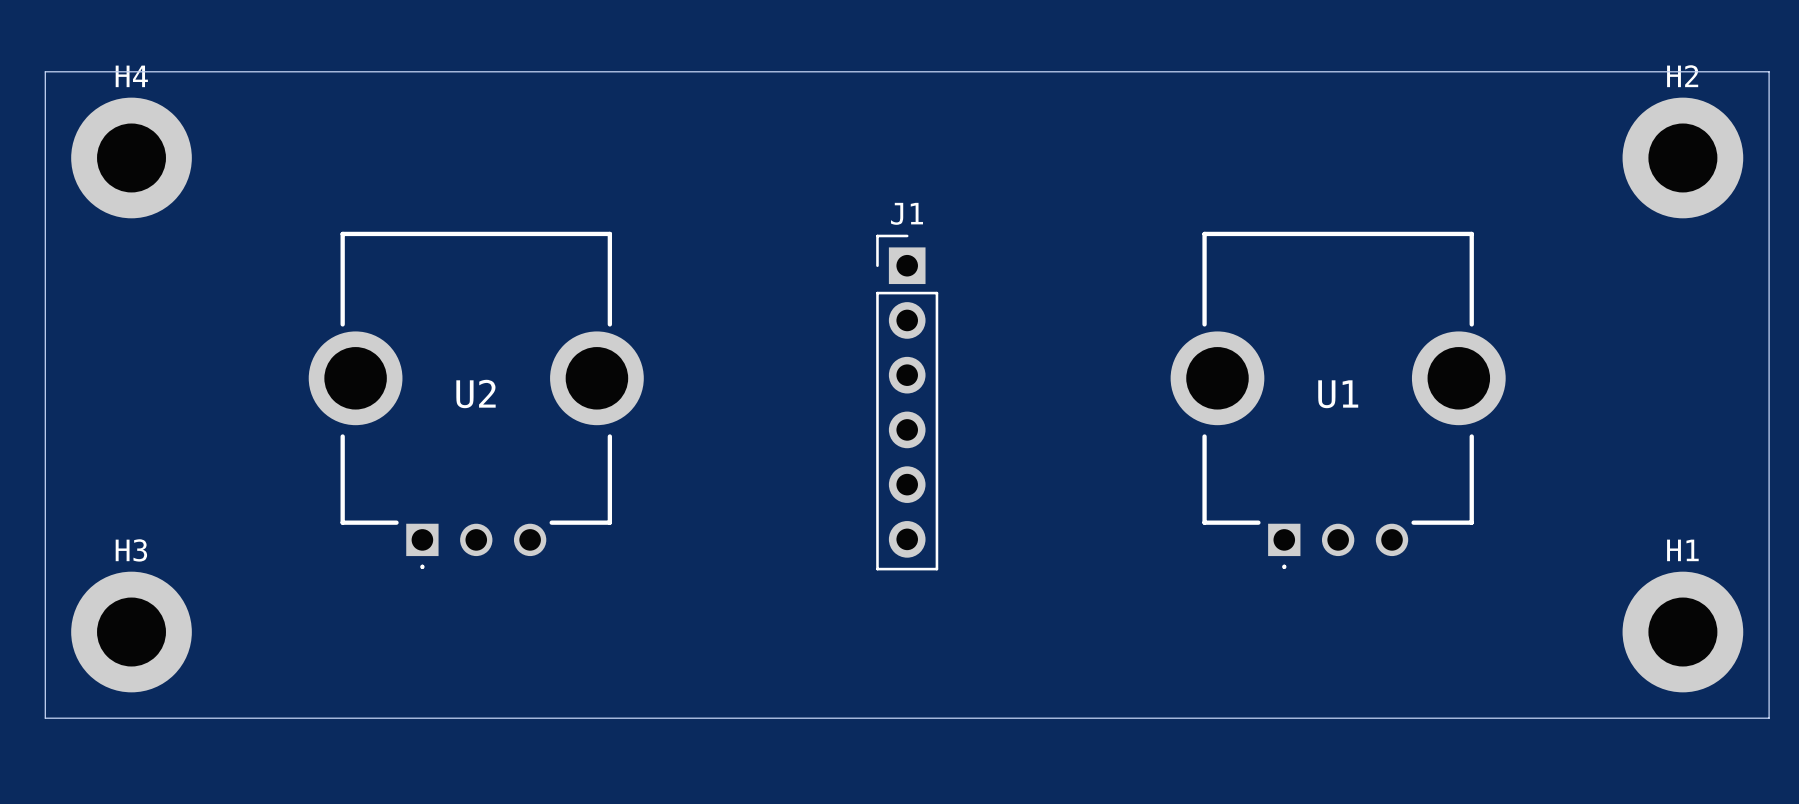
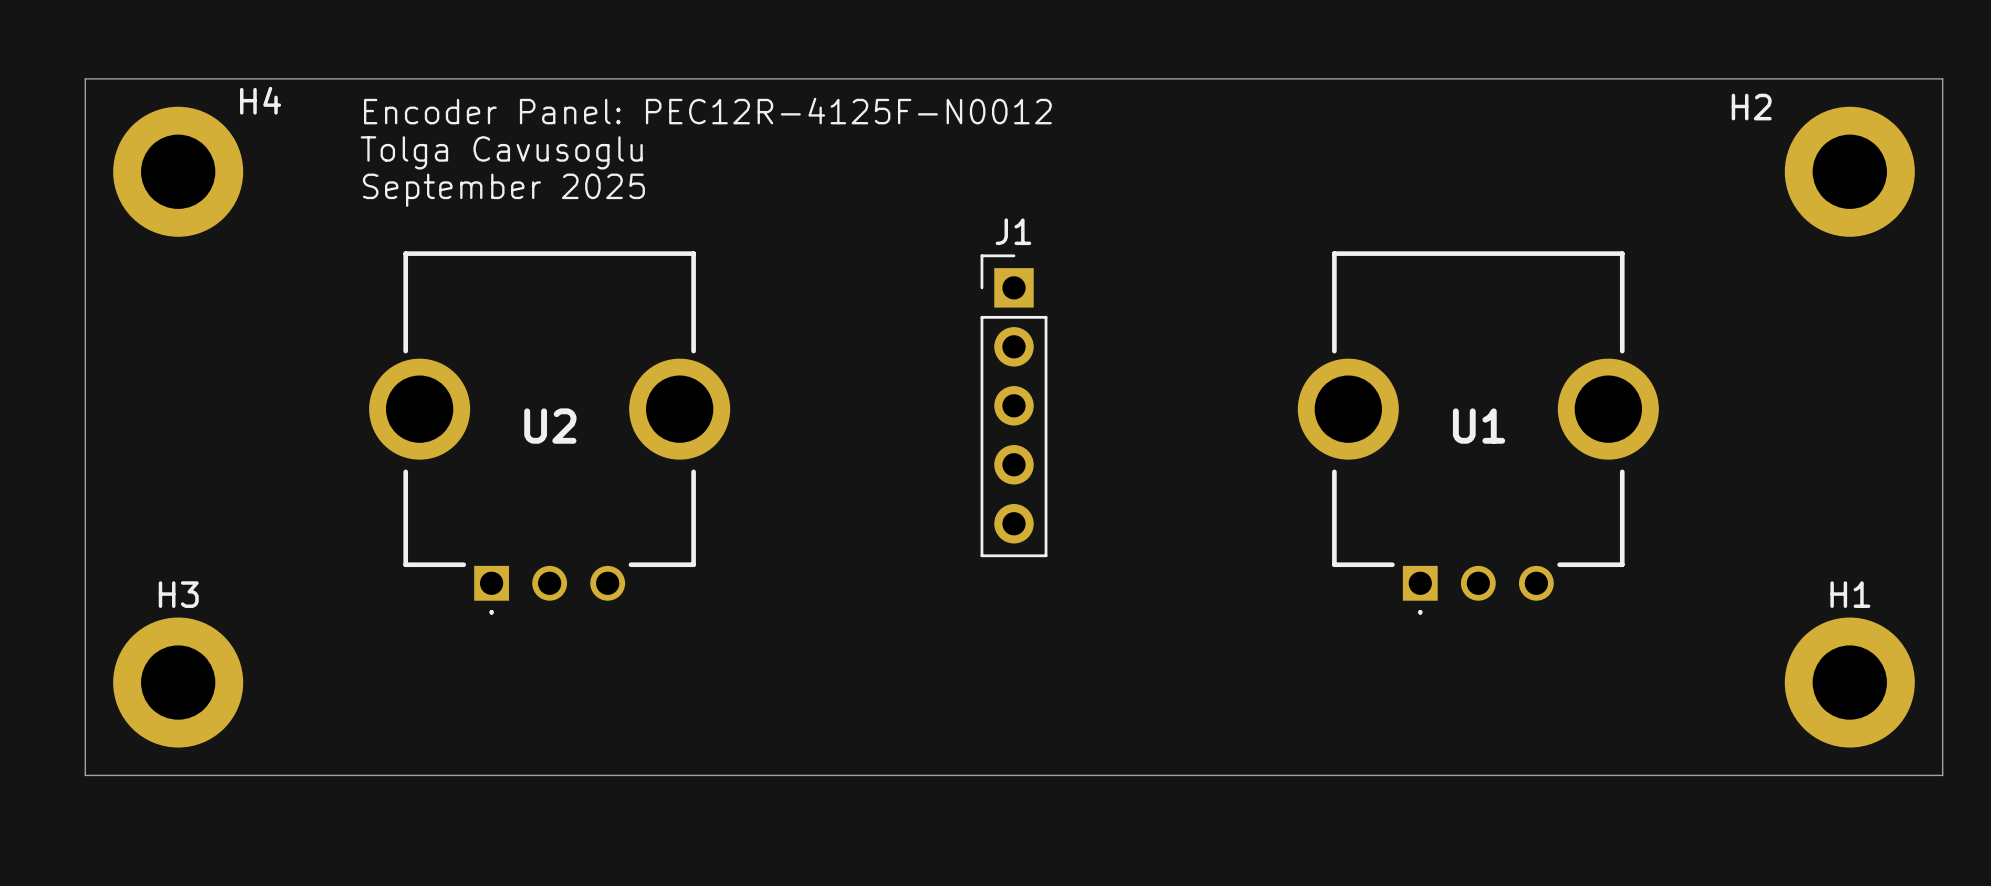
H4 name position: H4 (131, 76) -> H4 (260, 100)
H2 name position: H2 (1682, 76) -> H2 (1751, 107)
text: none -> Encoder Panel: PEC12R-4125F-N0012 (707, 111)
text: none -> Tolga Cavusoglu (501, 152)
text: none -> September 2025 (503, 190)
J1 footprint: [876, 234, 939, 571] -> [980, 254, 1048, 558]

